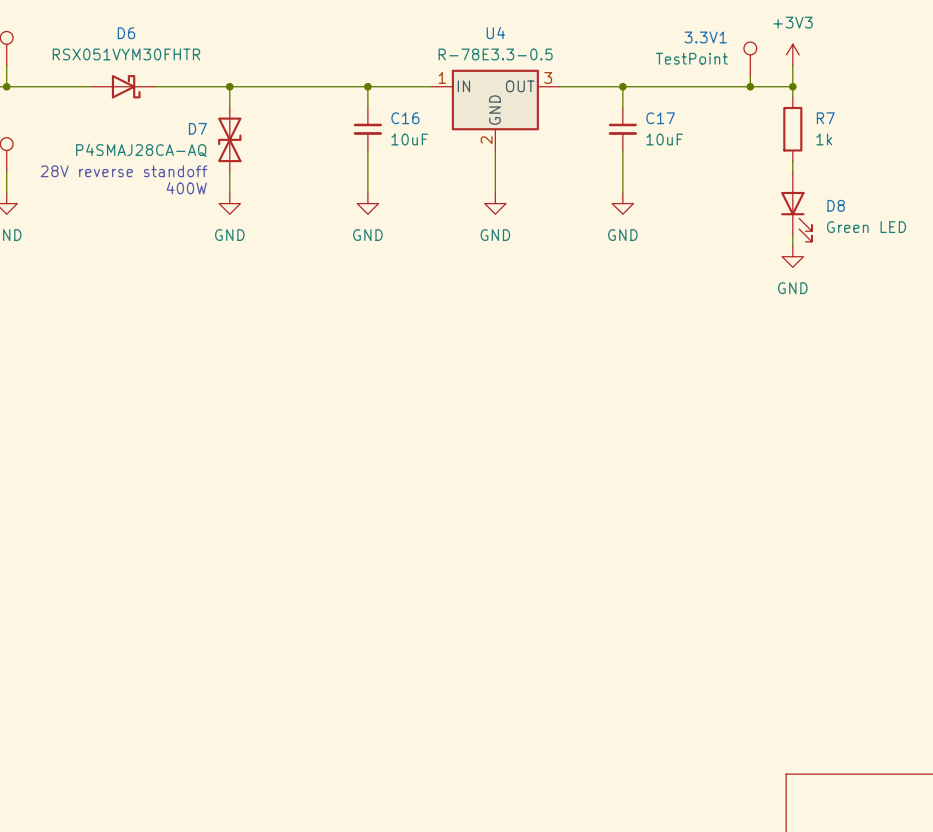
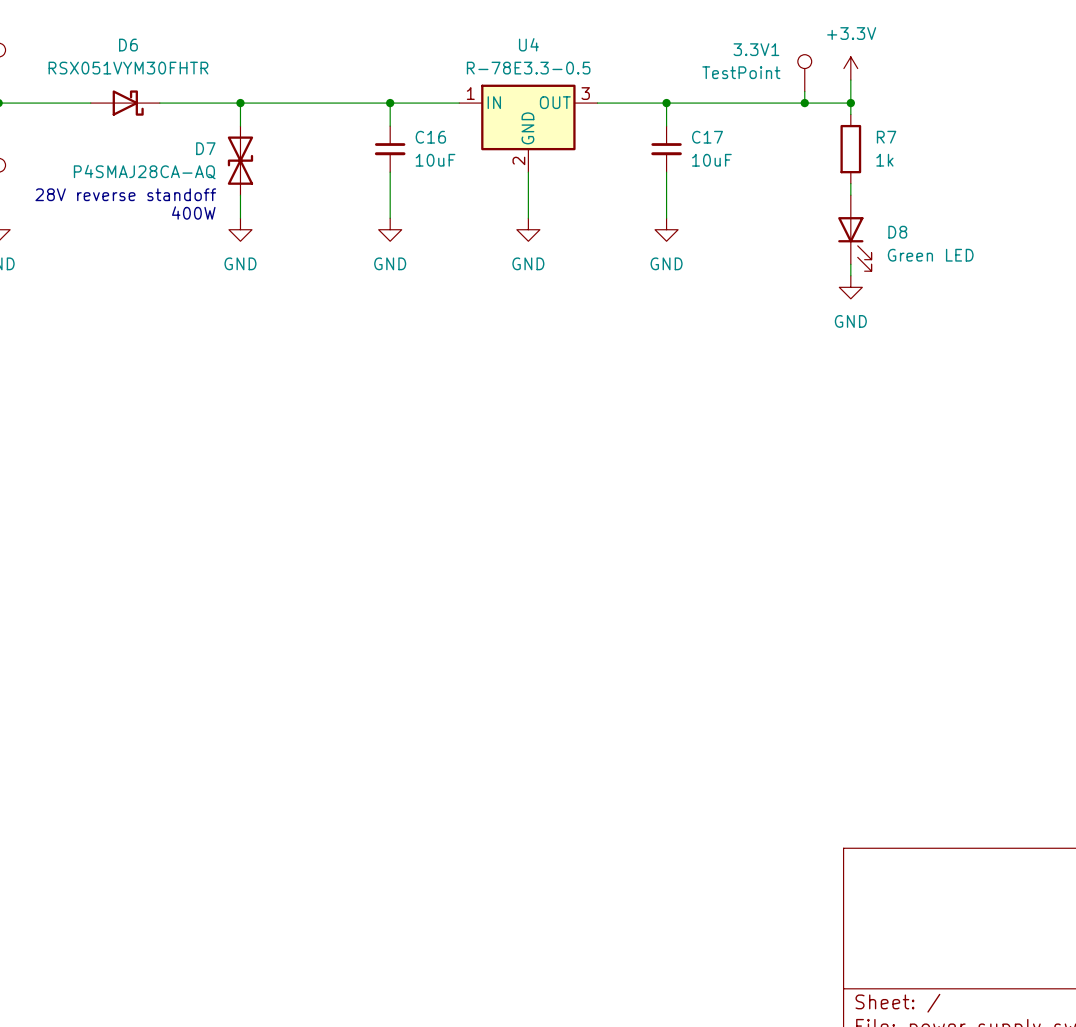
power symbol: +3V3 (792, 54) -> +3.3V (850, 68)

